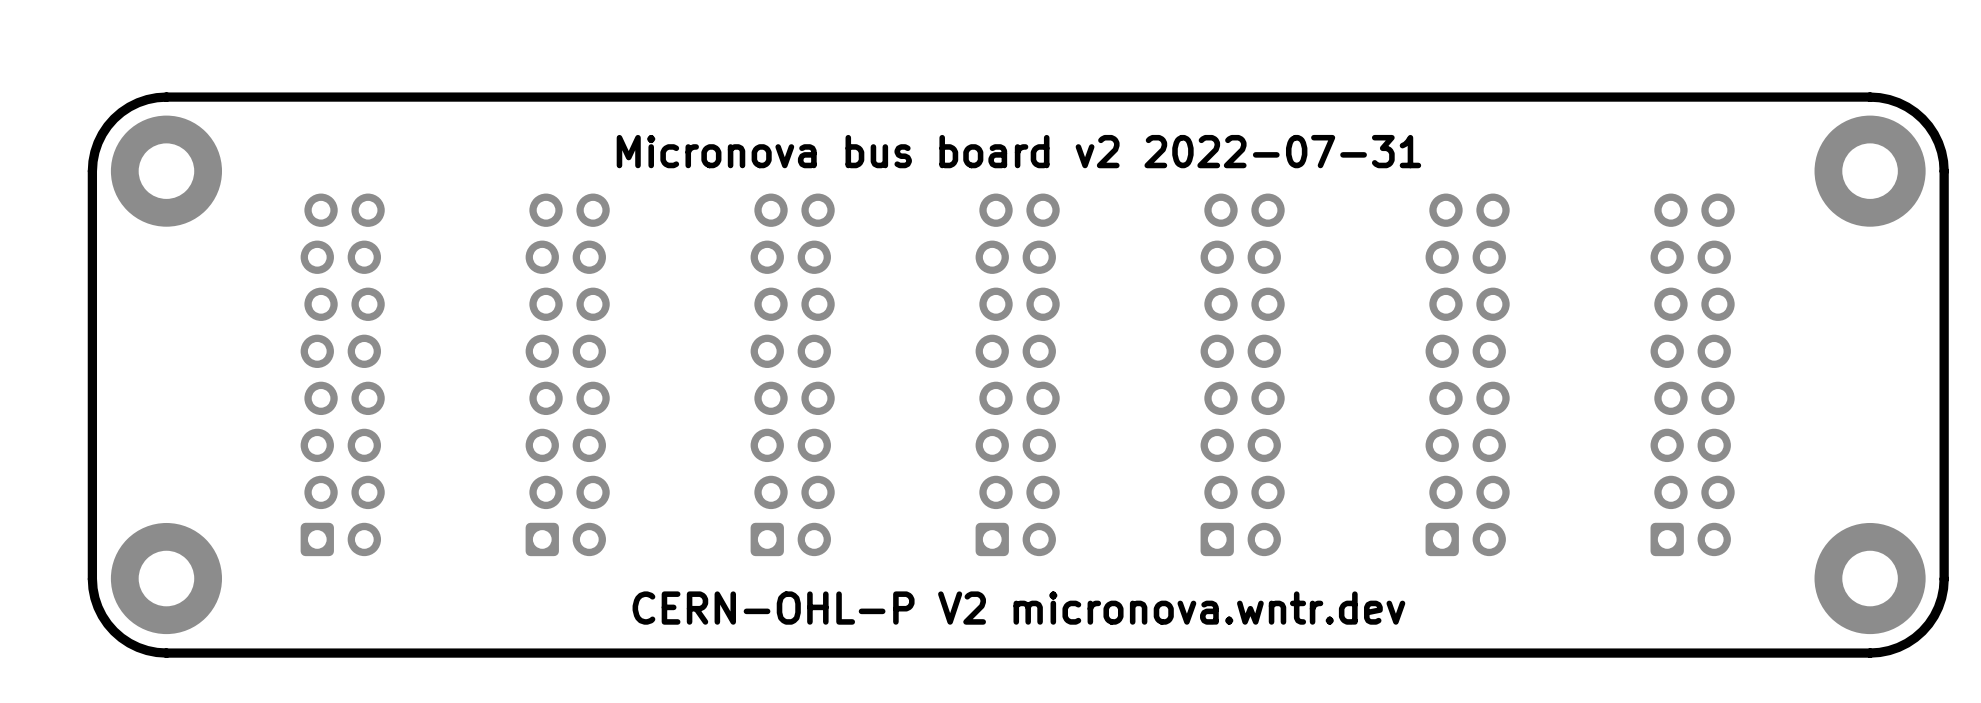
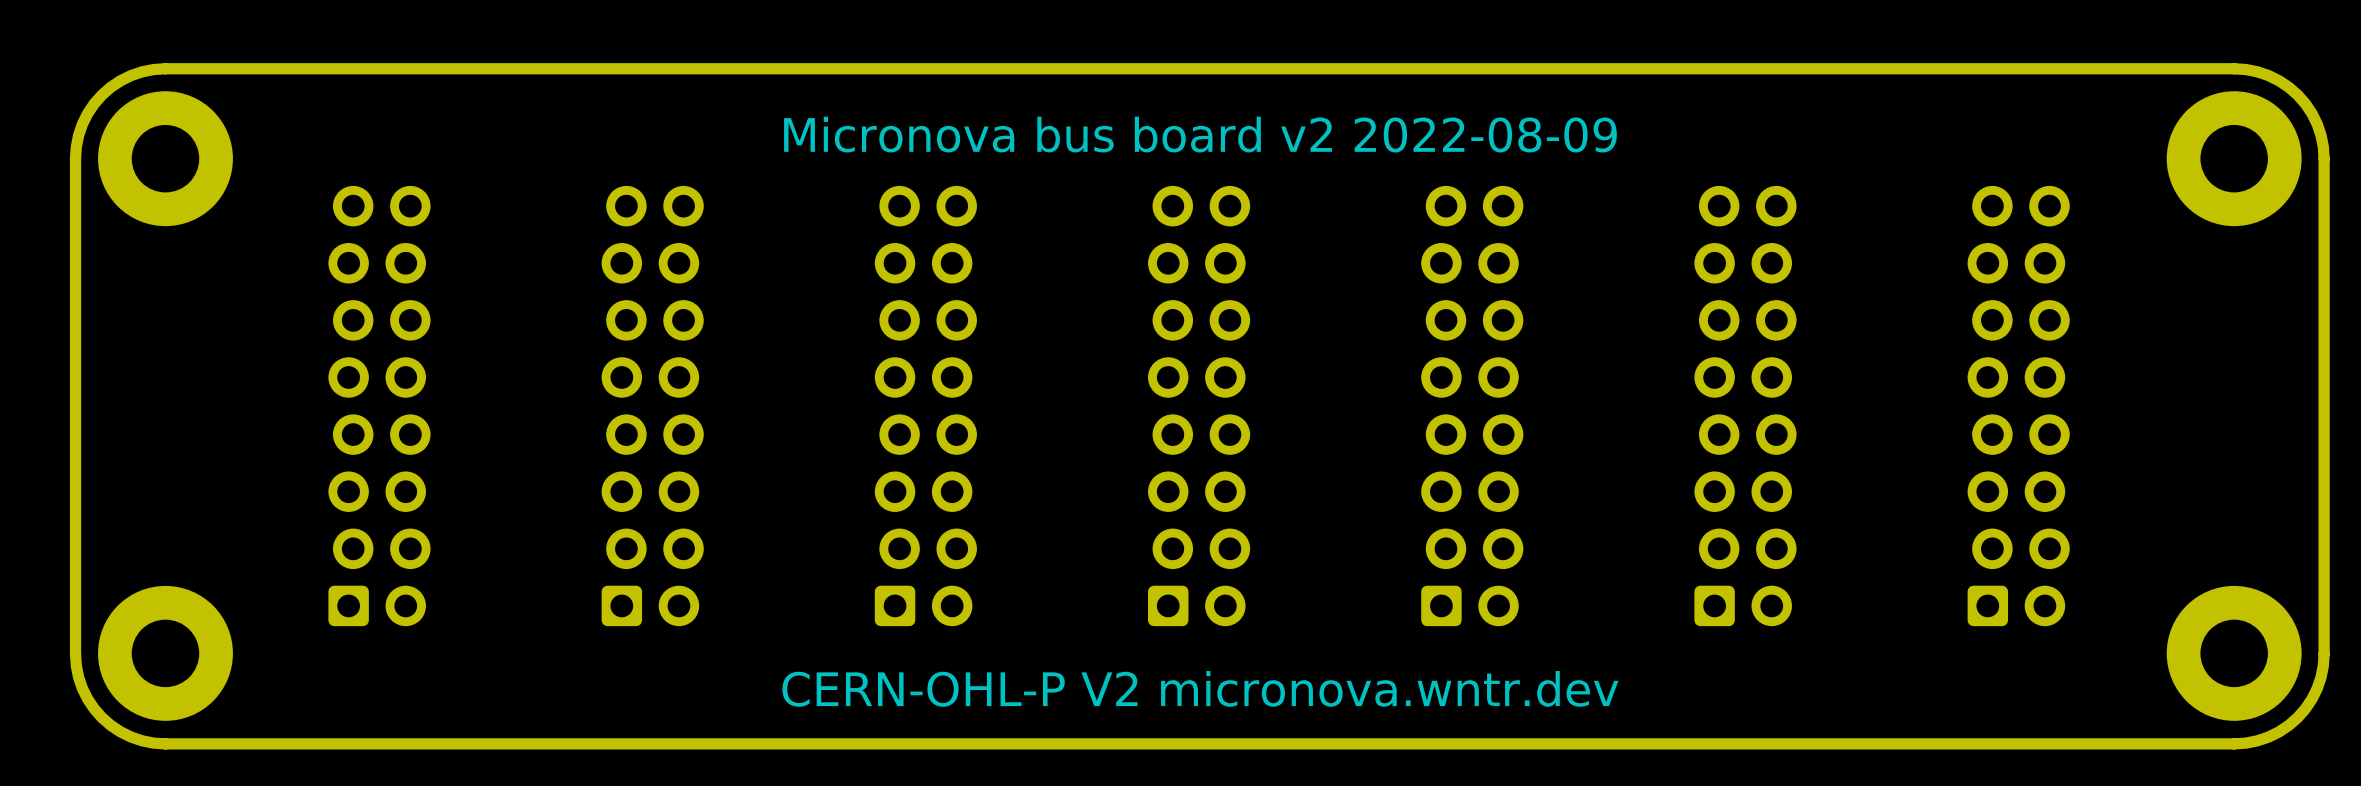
text: Micronova bus board v2 2022-07-31 (1018, 151) -> Micronova bus board v2 2022-08-09 (1200, 134)

